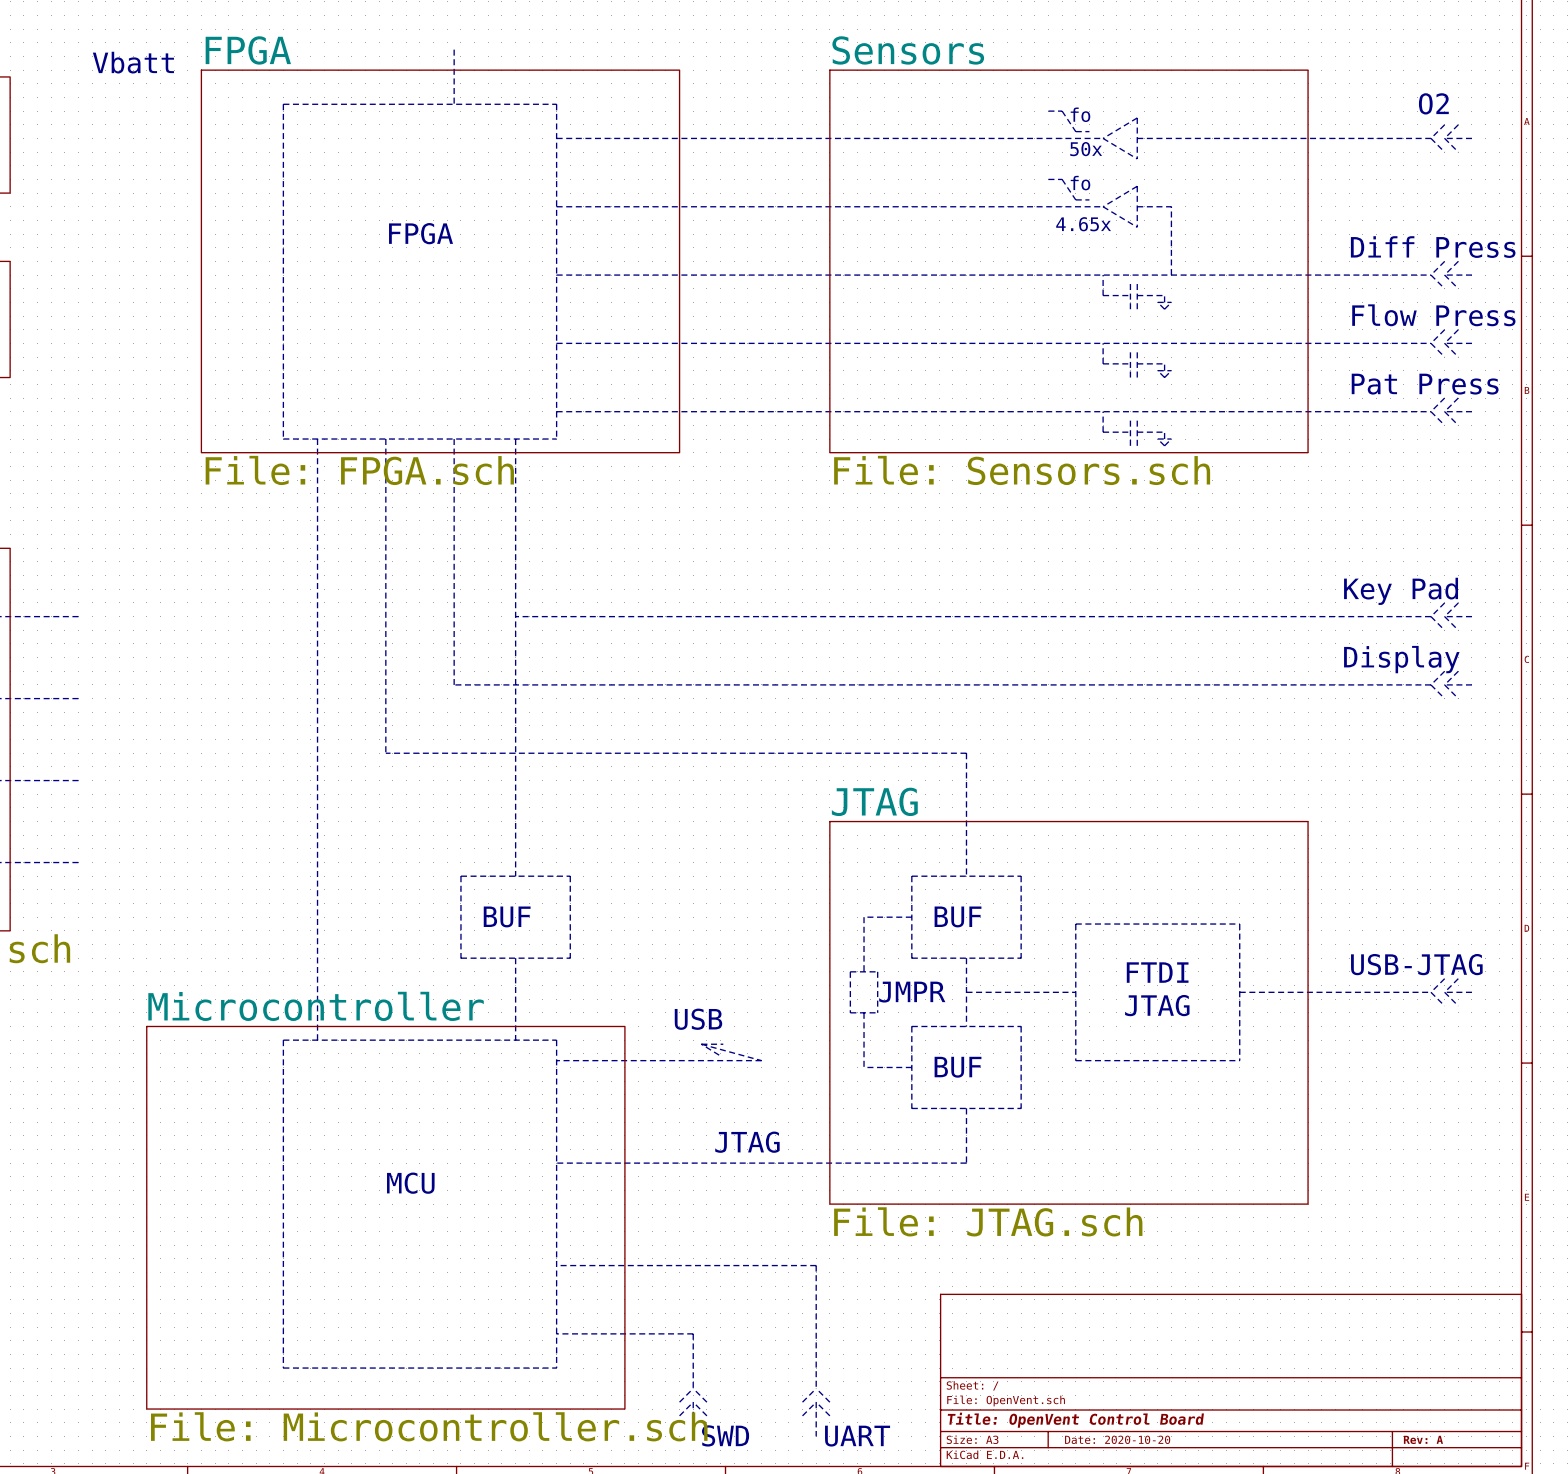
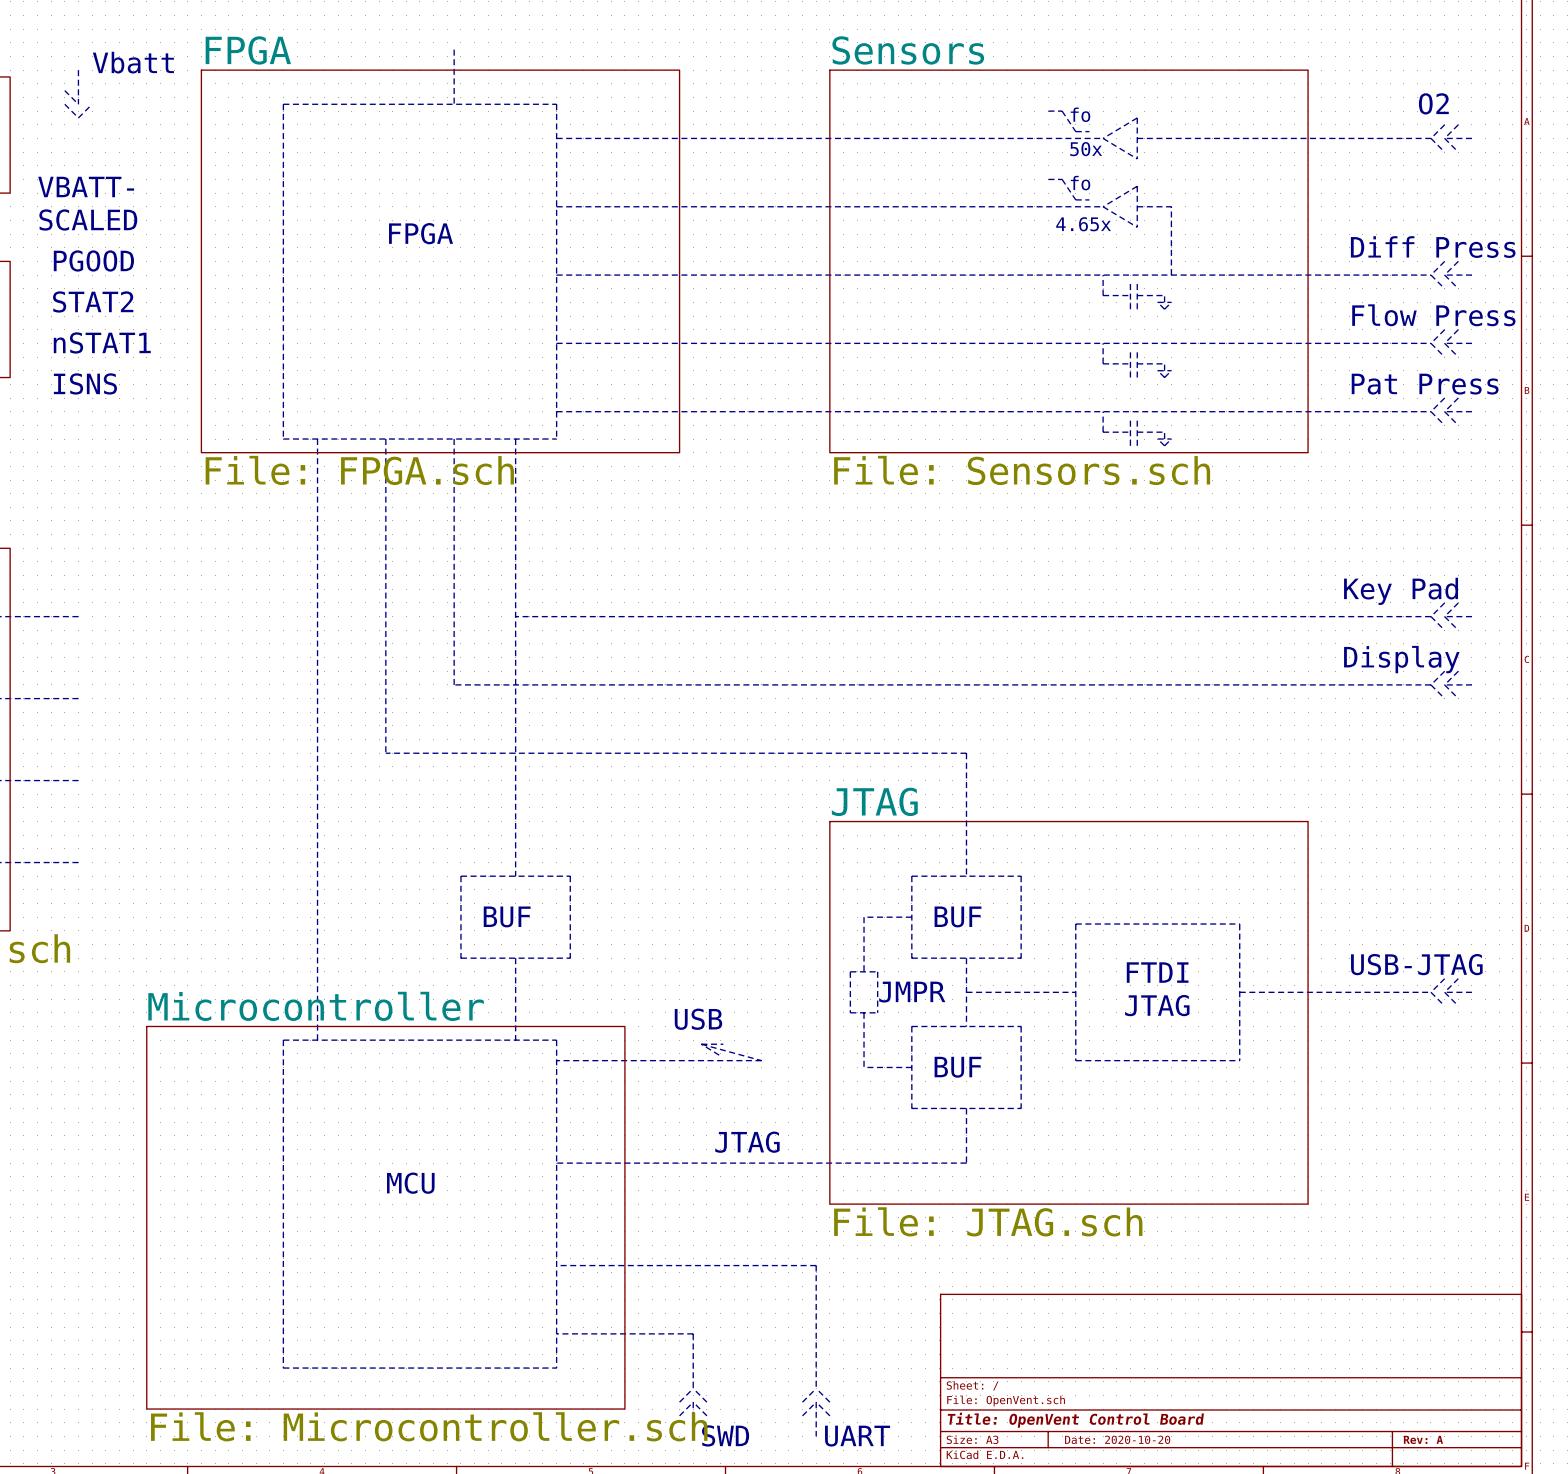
line: none -> (78, 70) (78, 104) (64, 90)
line: none -> (64, 104) (78, 117) (92, 104)
text: none -> VBATT- (86, 186)
text: none -> SCALED (88, 219)
text: none -> PGOOD (93, 260)
text: none -> STAT2 (93, 301)
text: none -> nSTAT1 (102, 342)
text: none -> ISNS (85, 383)

